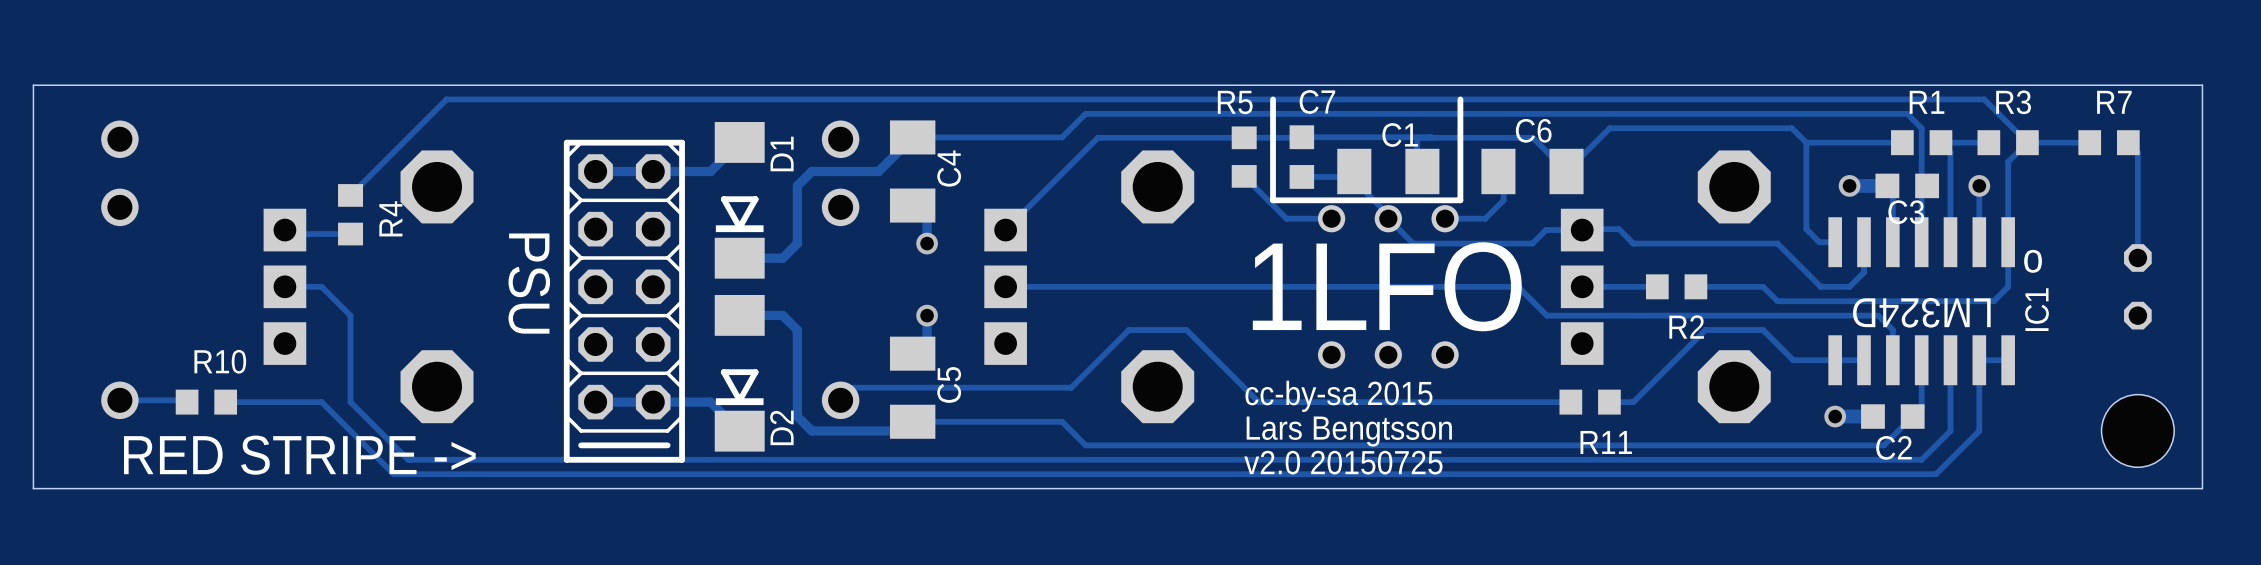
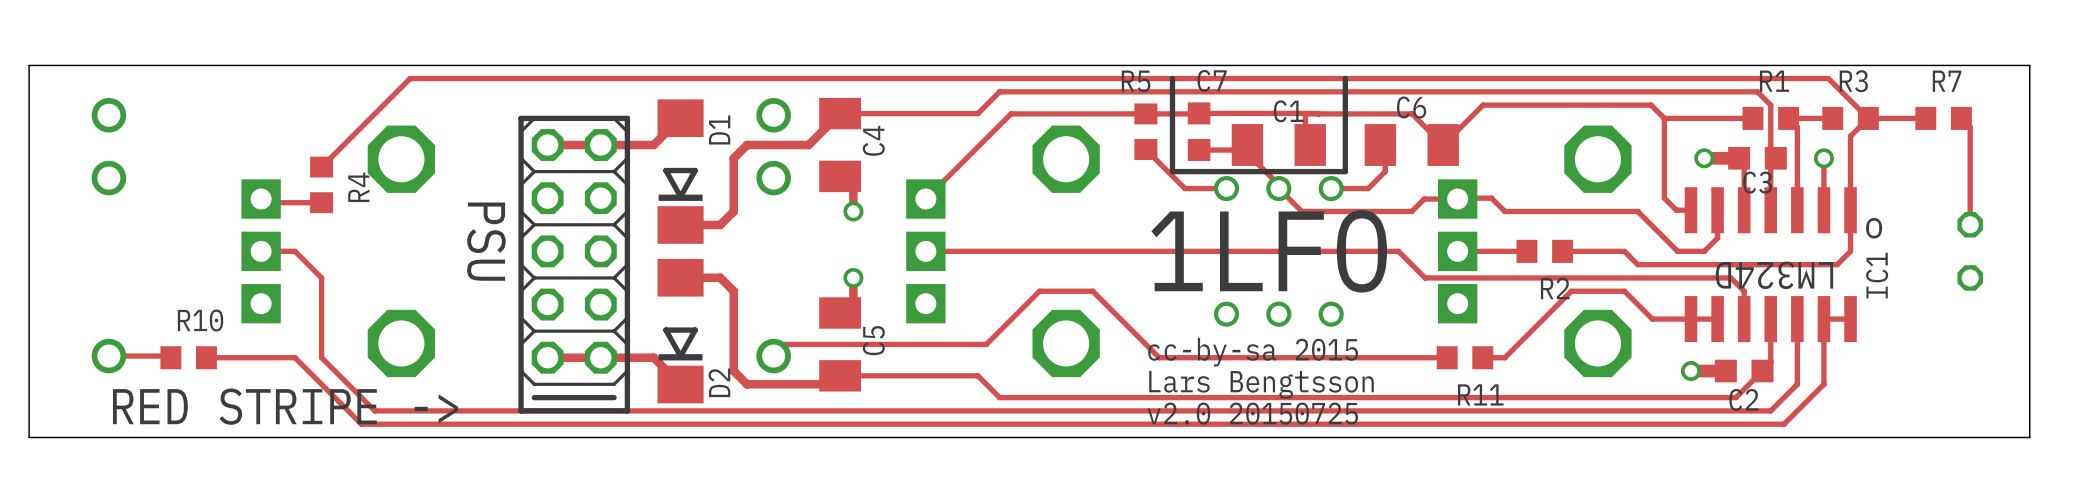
hole: (2137, 430) -> none

